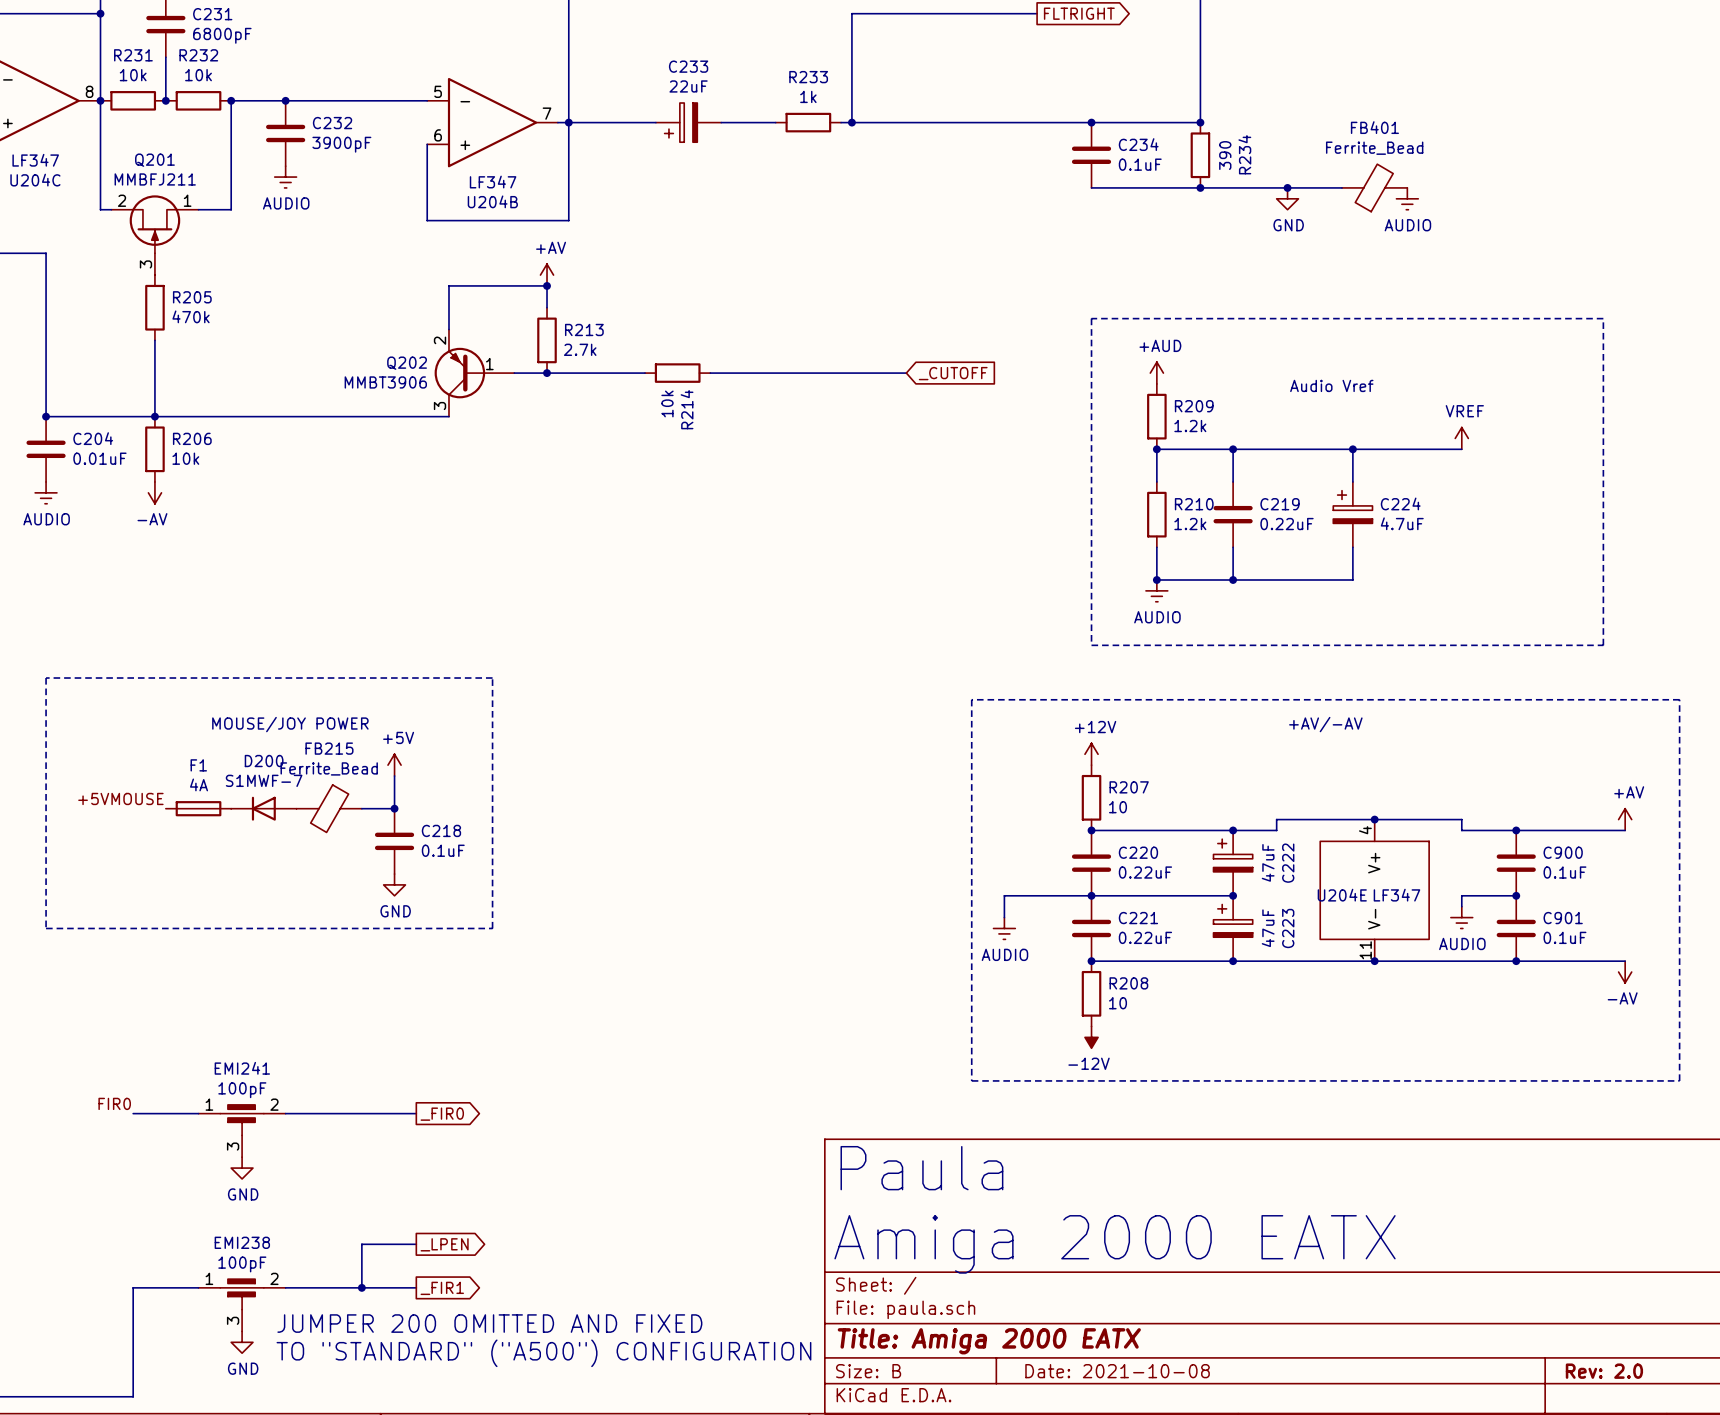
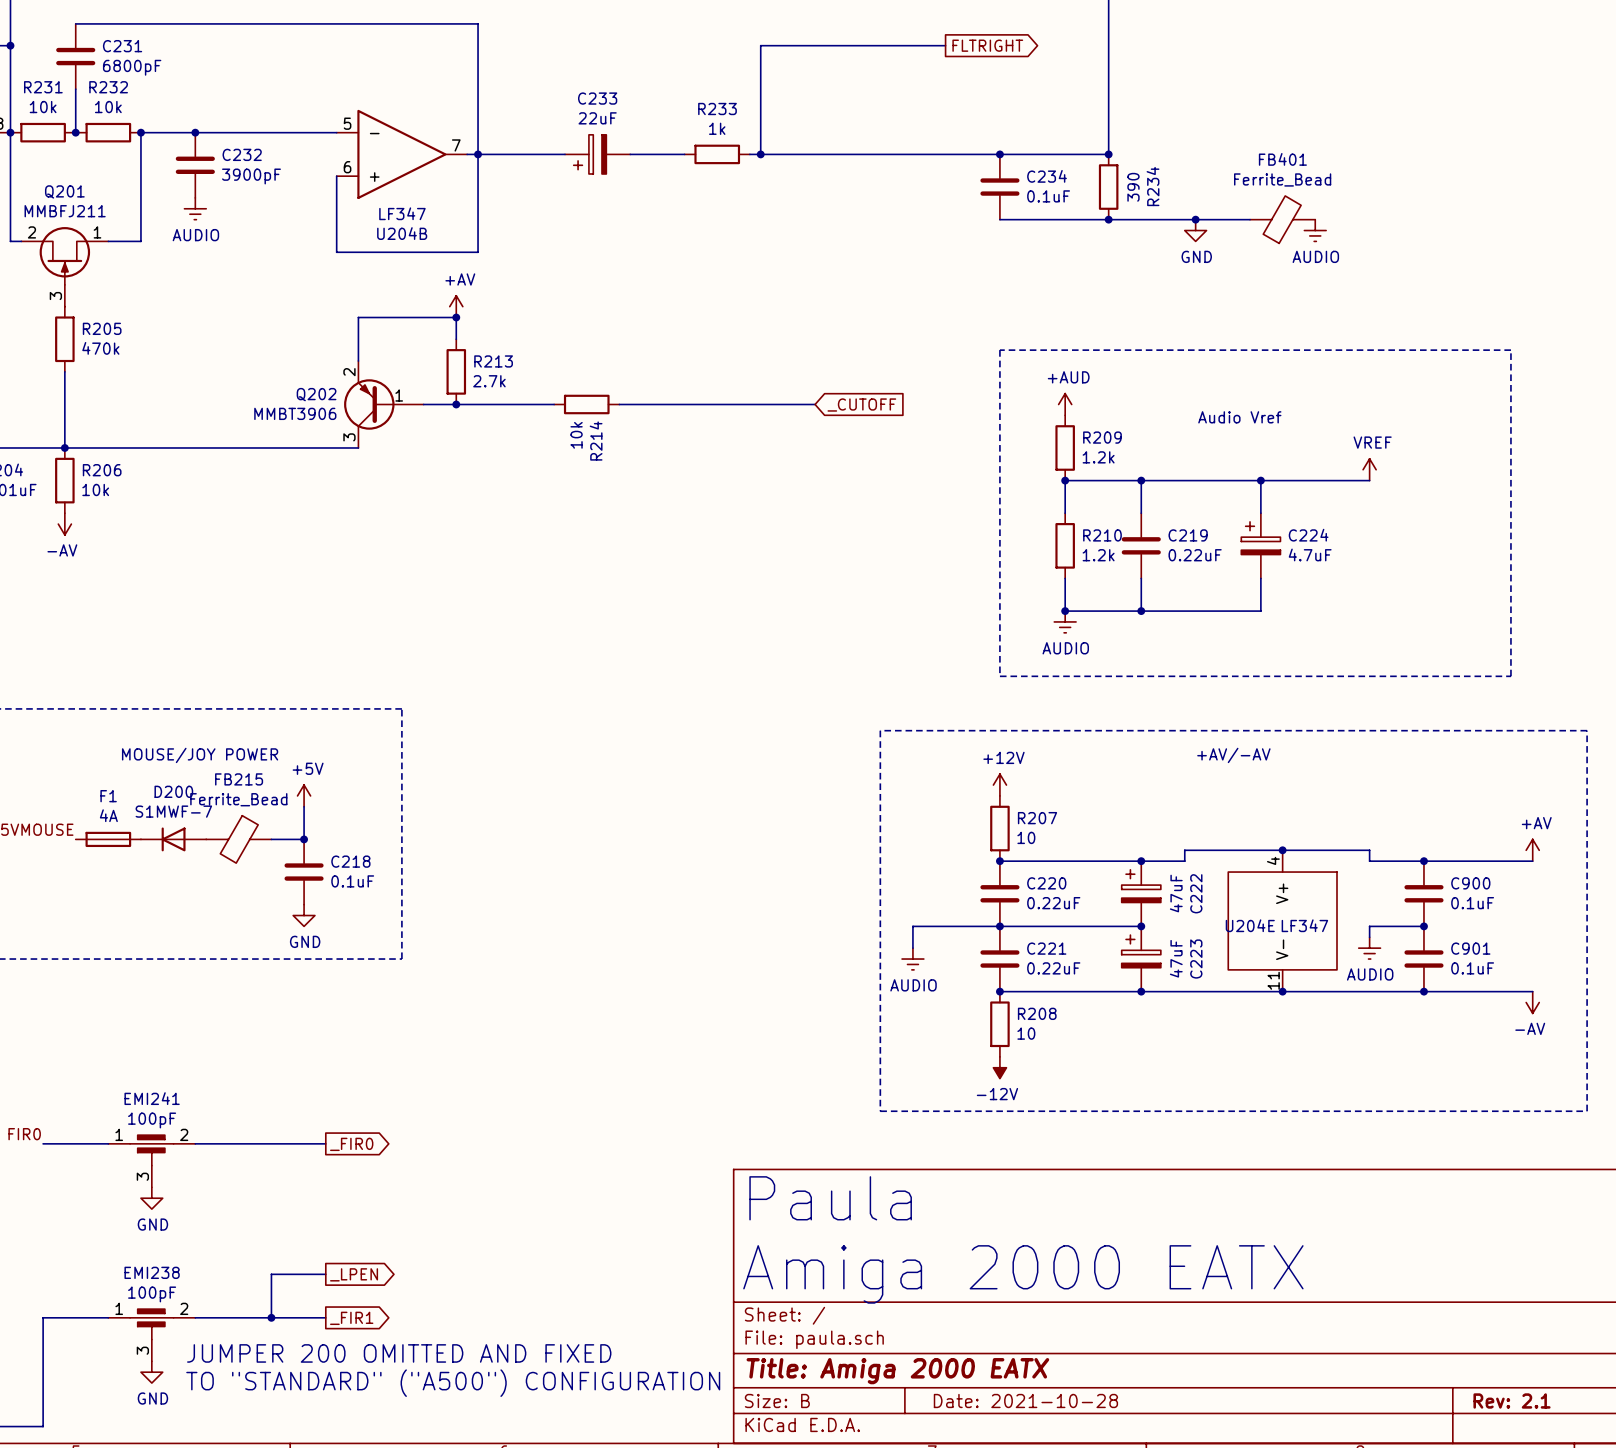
title block: Date: 2021-10-08 (1117, 1371) -> Date: 2021-10-28 (1025, 1400)
title block: Rev: 2.0 (1604, 1371) -> Rev: 2.1 (1512, 1400)

